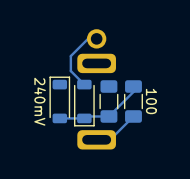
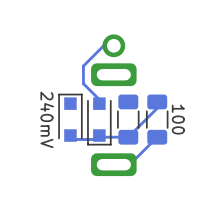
part footprint: [49, 76, 71, 124] -> [58, 93, 83, 142]
part footprint: [74, 79, 95, 127] -> [87, 97, 112, 146]

